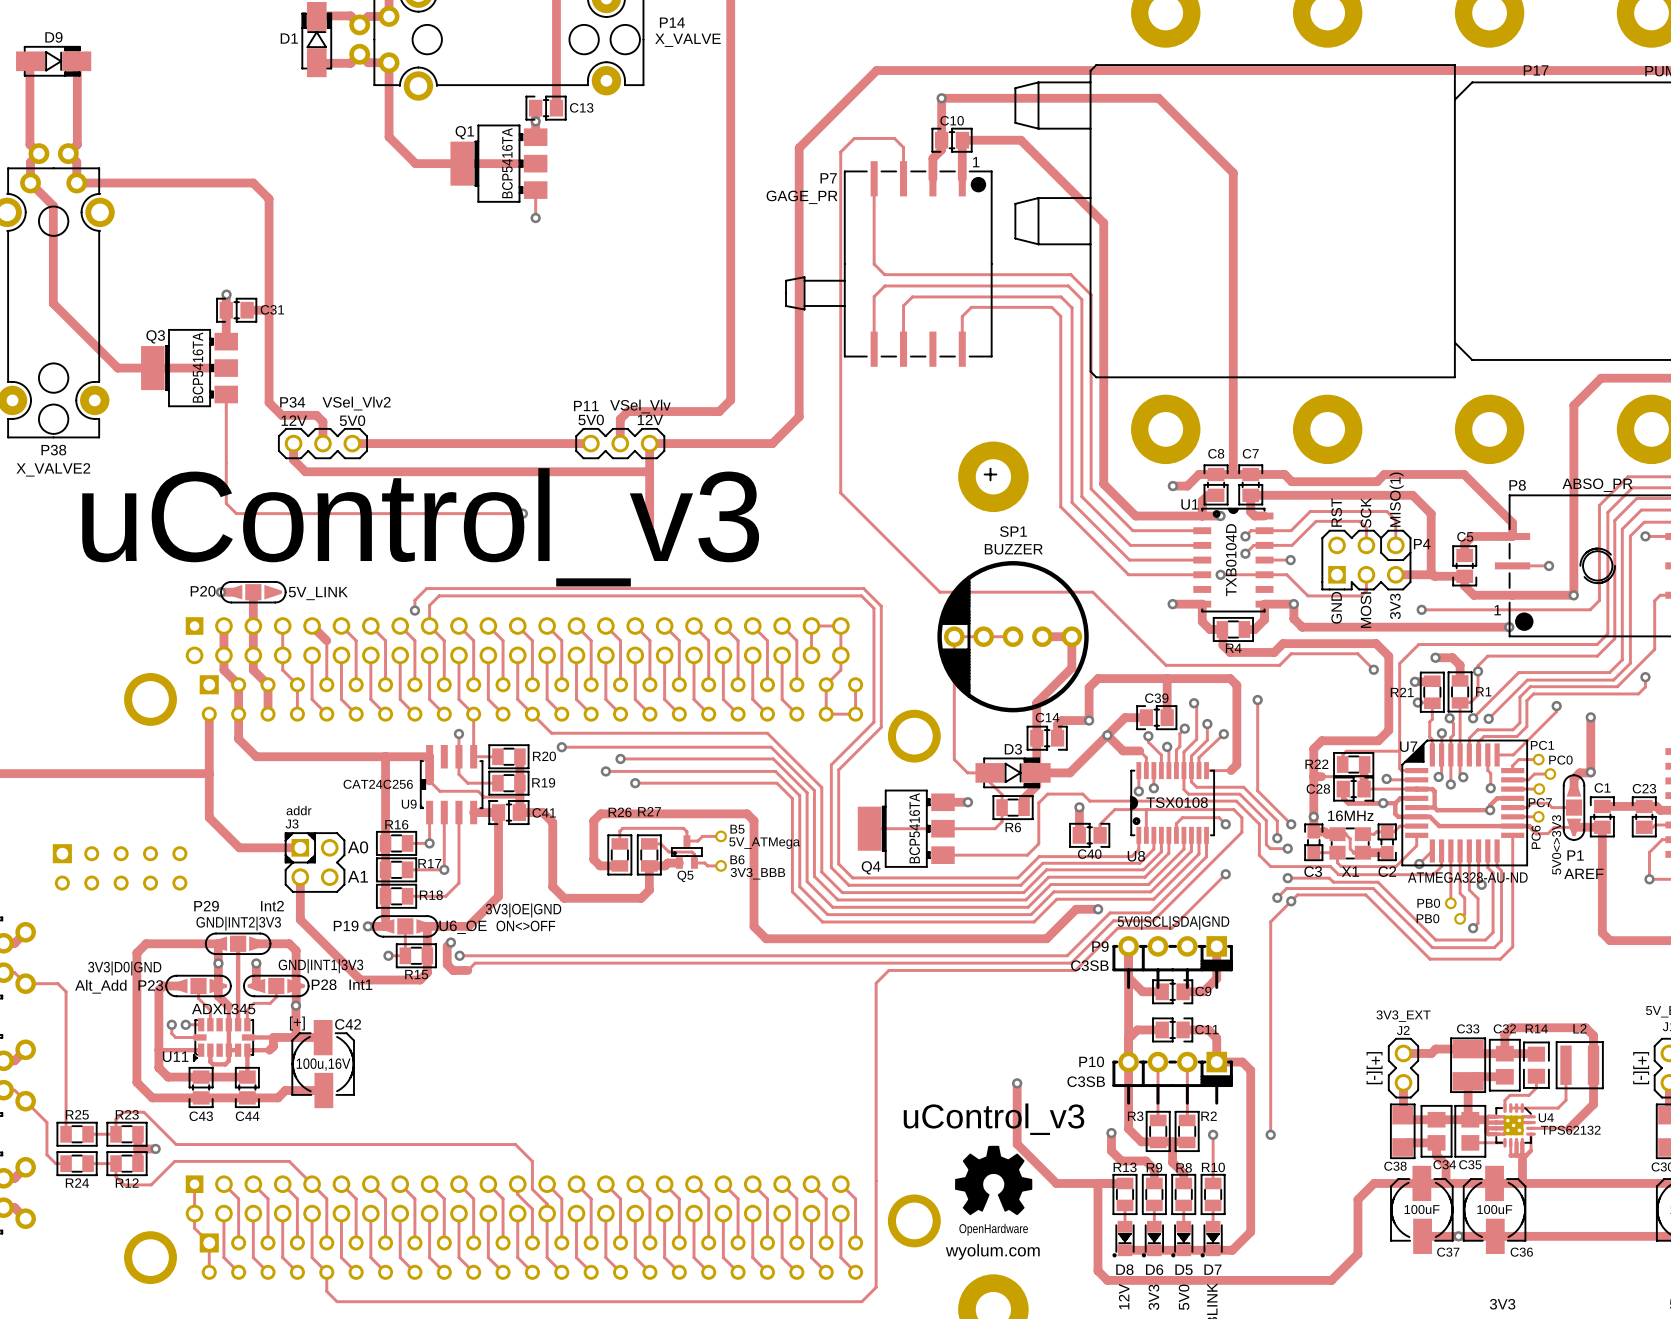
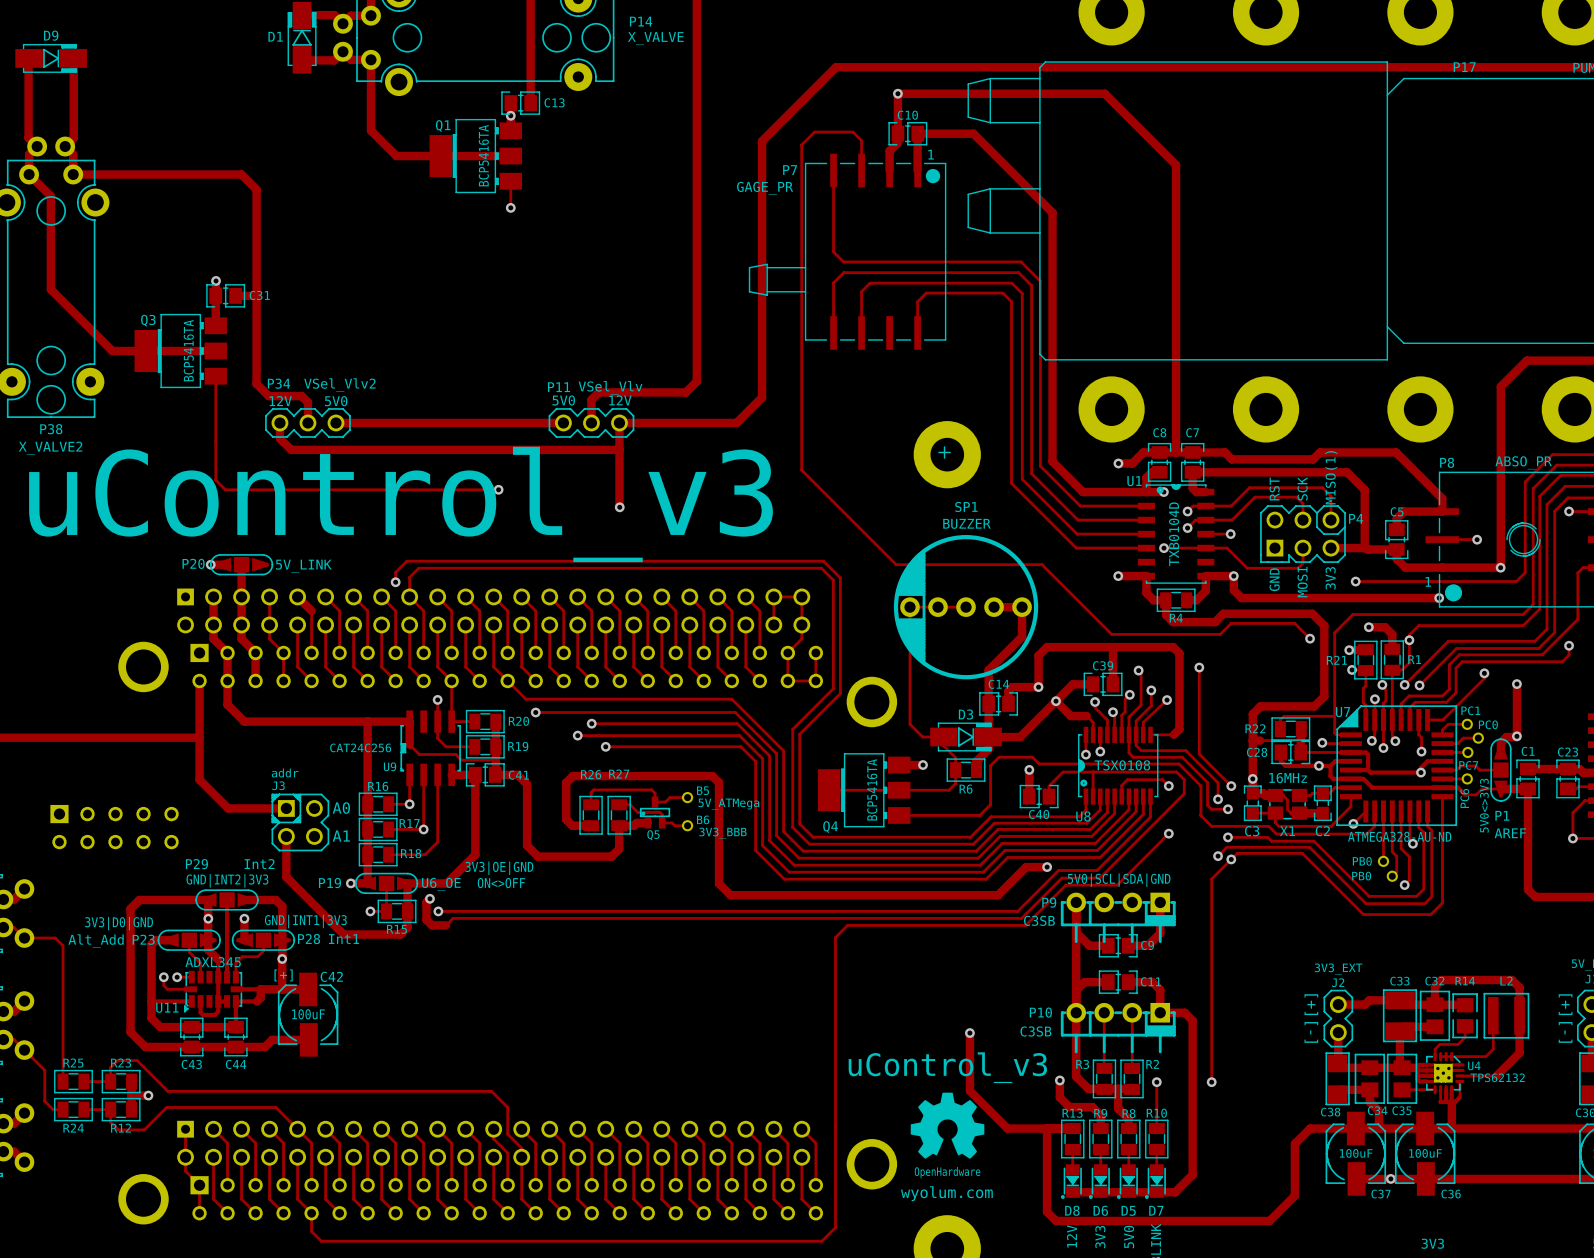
C42 value: 100u,16V (323, 1064) -> 100uF (308, 1014)

